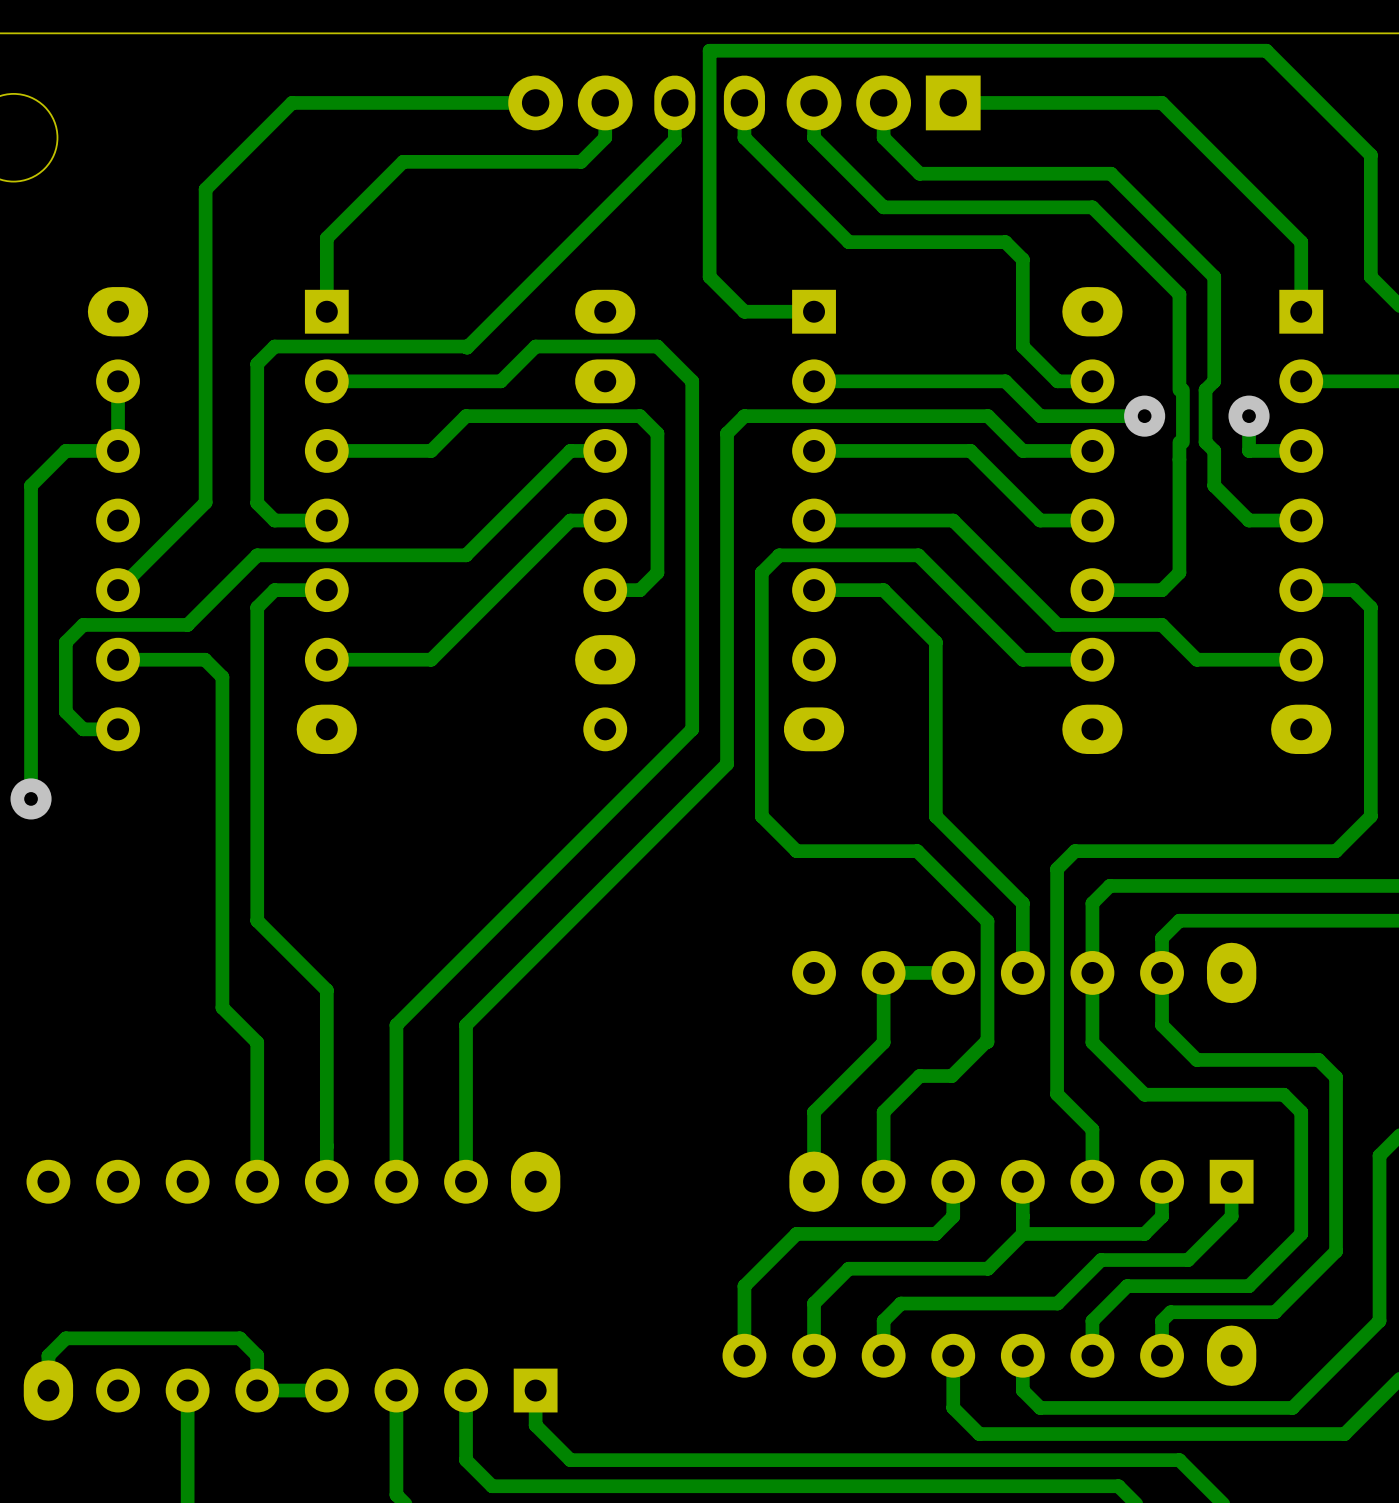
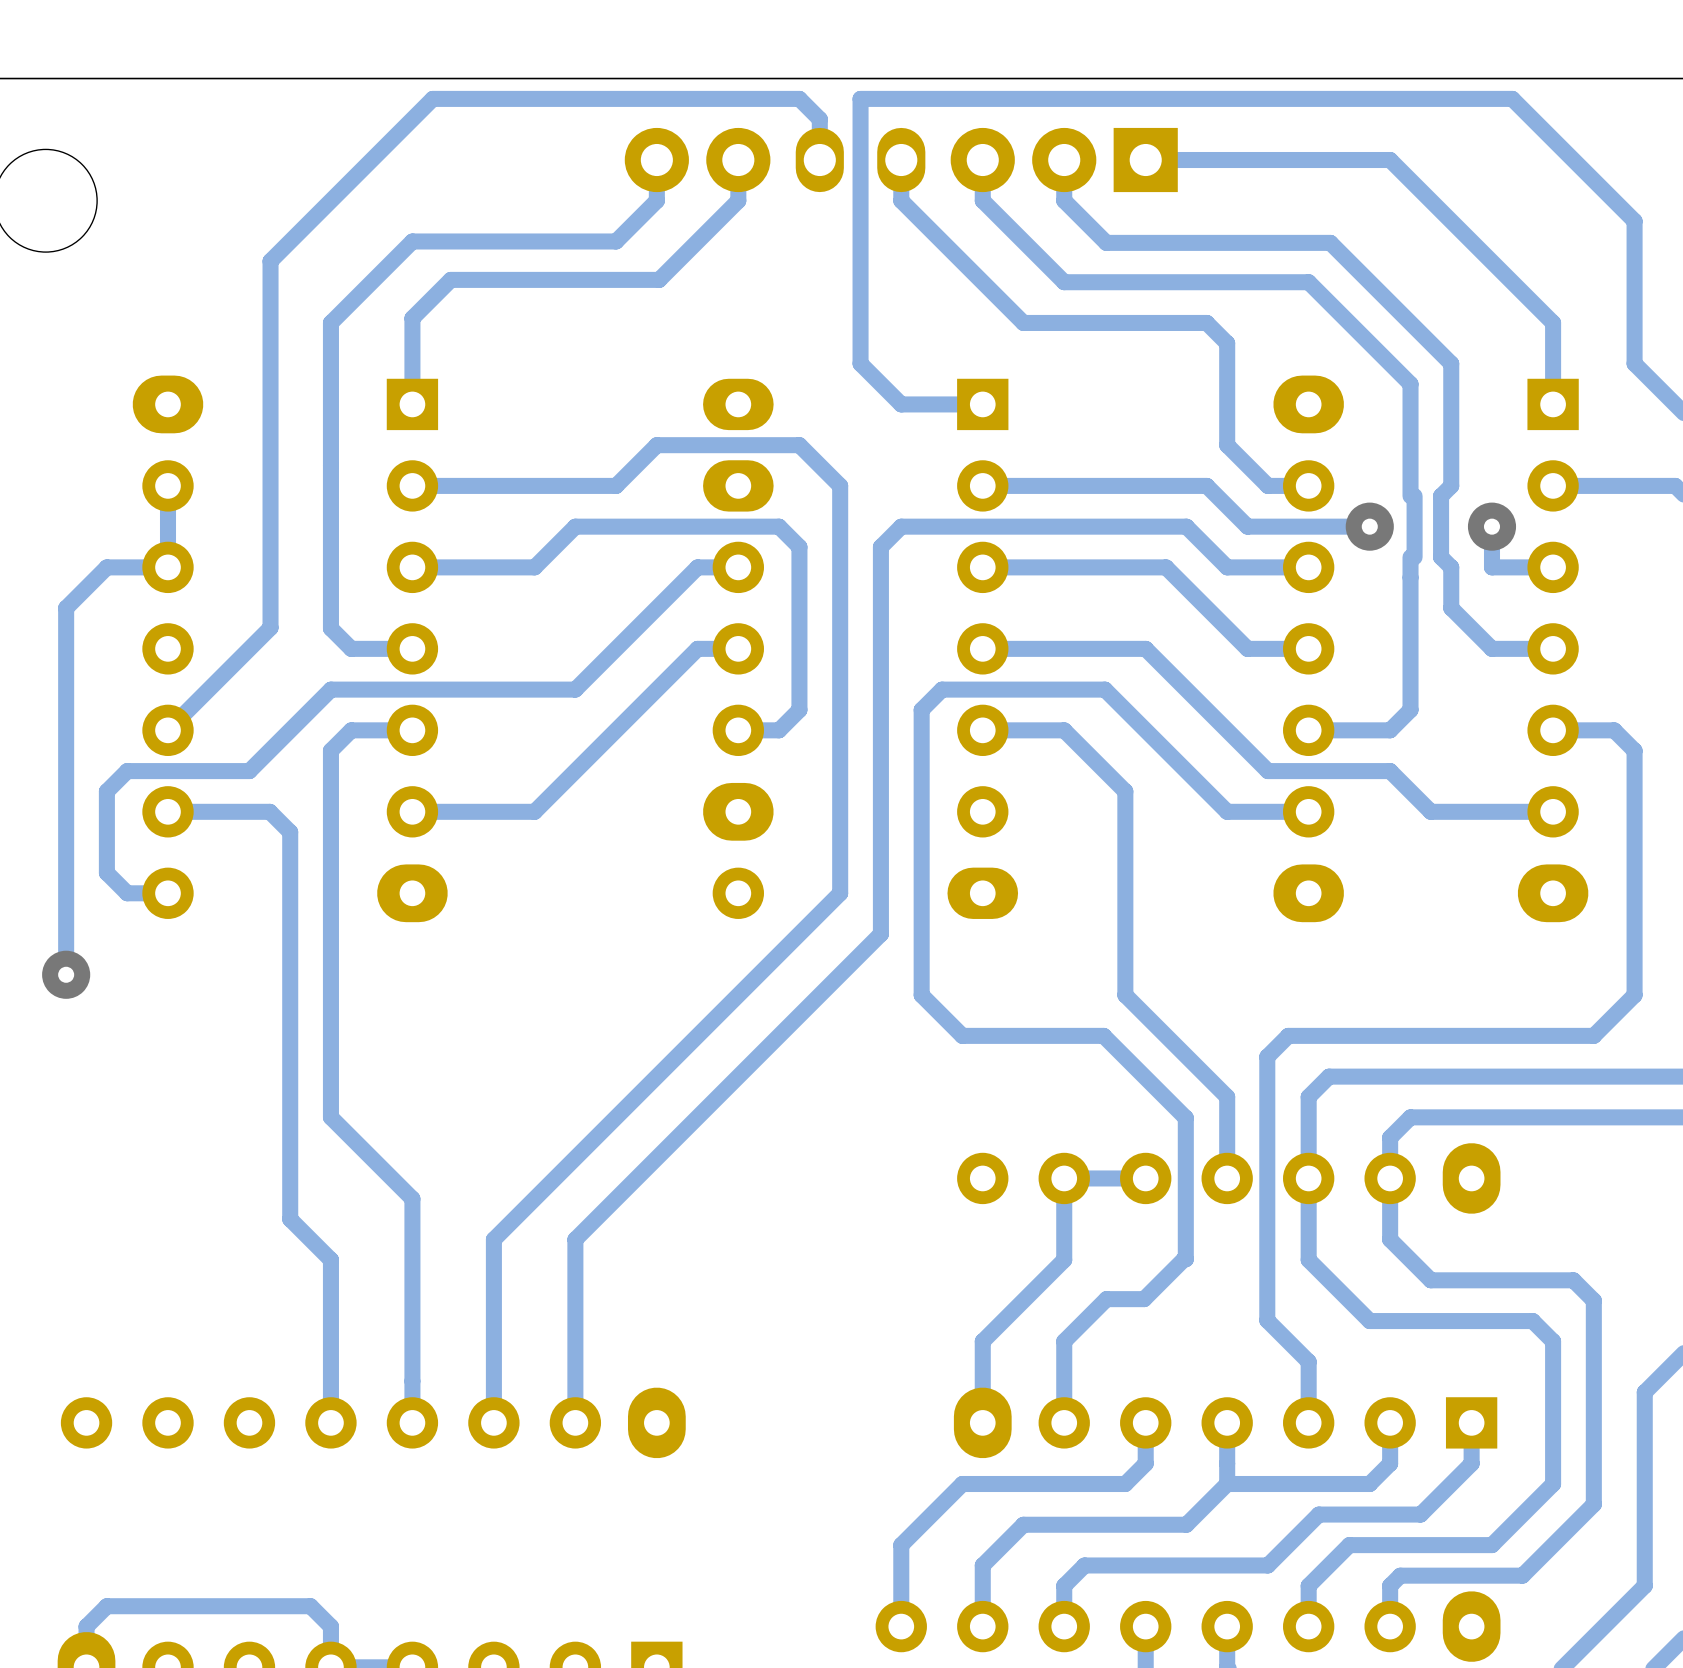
track: (535, 102) (292, 102) -> (819, 160) (819, 119) (799, 98) (432, 98) (371, 160)
track: (674, 102) (674, 139) (467, 347) (274, 346) (257, 363) -> (656, 160) (656, 200) (616, 241) (412, 241) (330, 322) (330, 465)
track: (581, 161) (403, 161) (359, 205) -> (710, 228) (659, 279) (450, 279)

